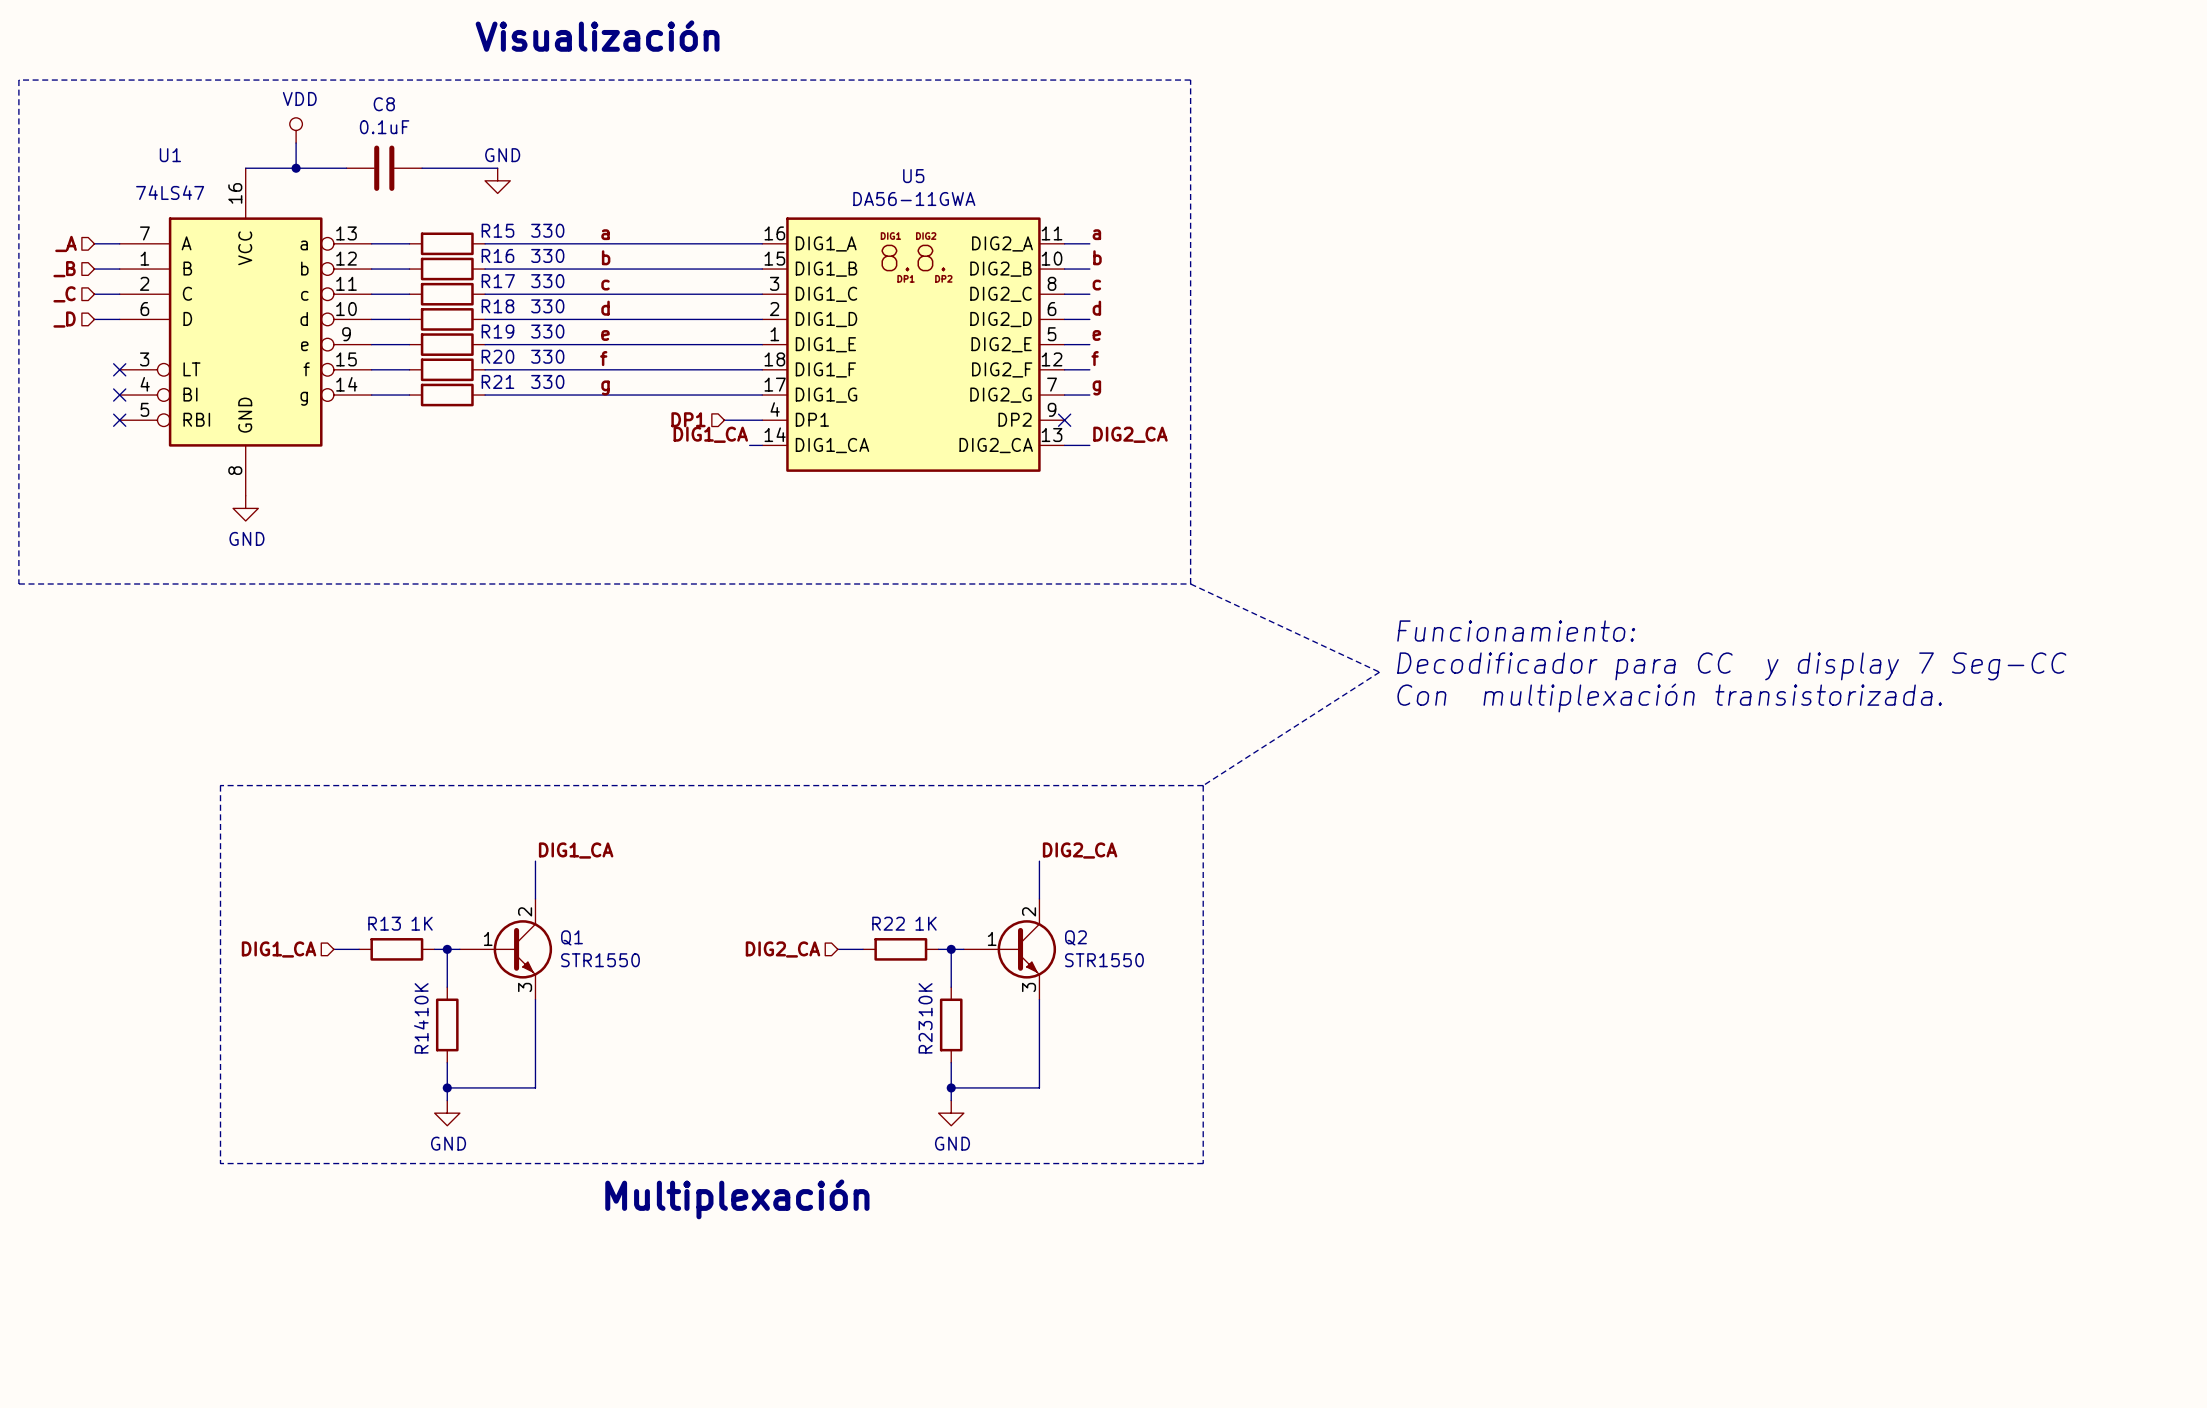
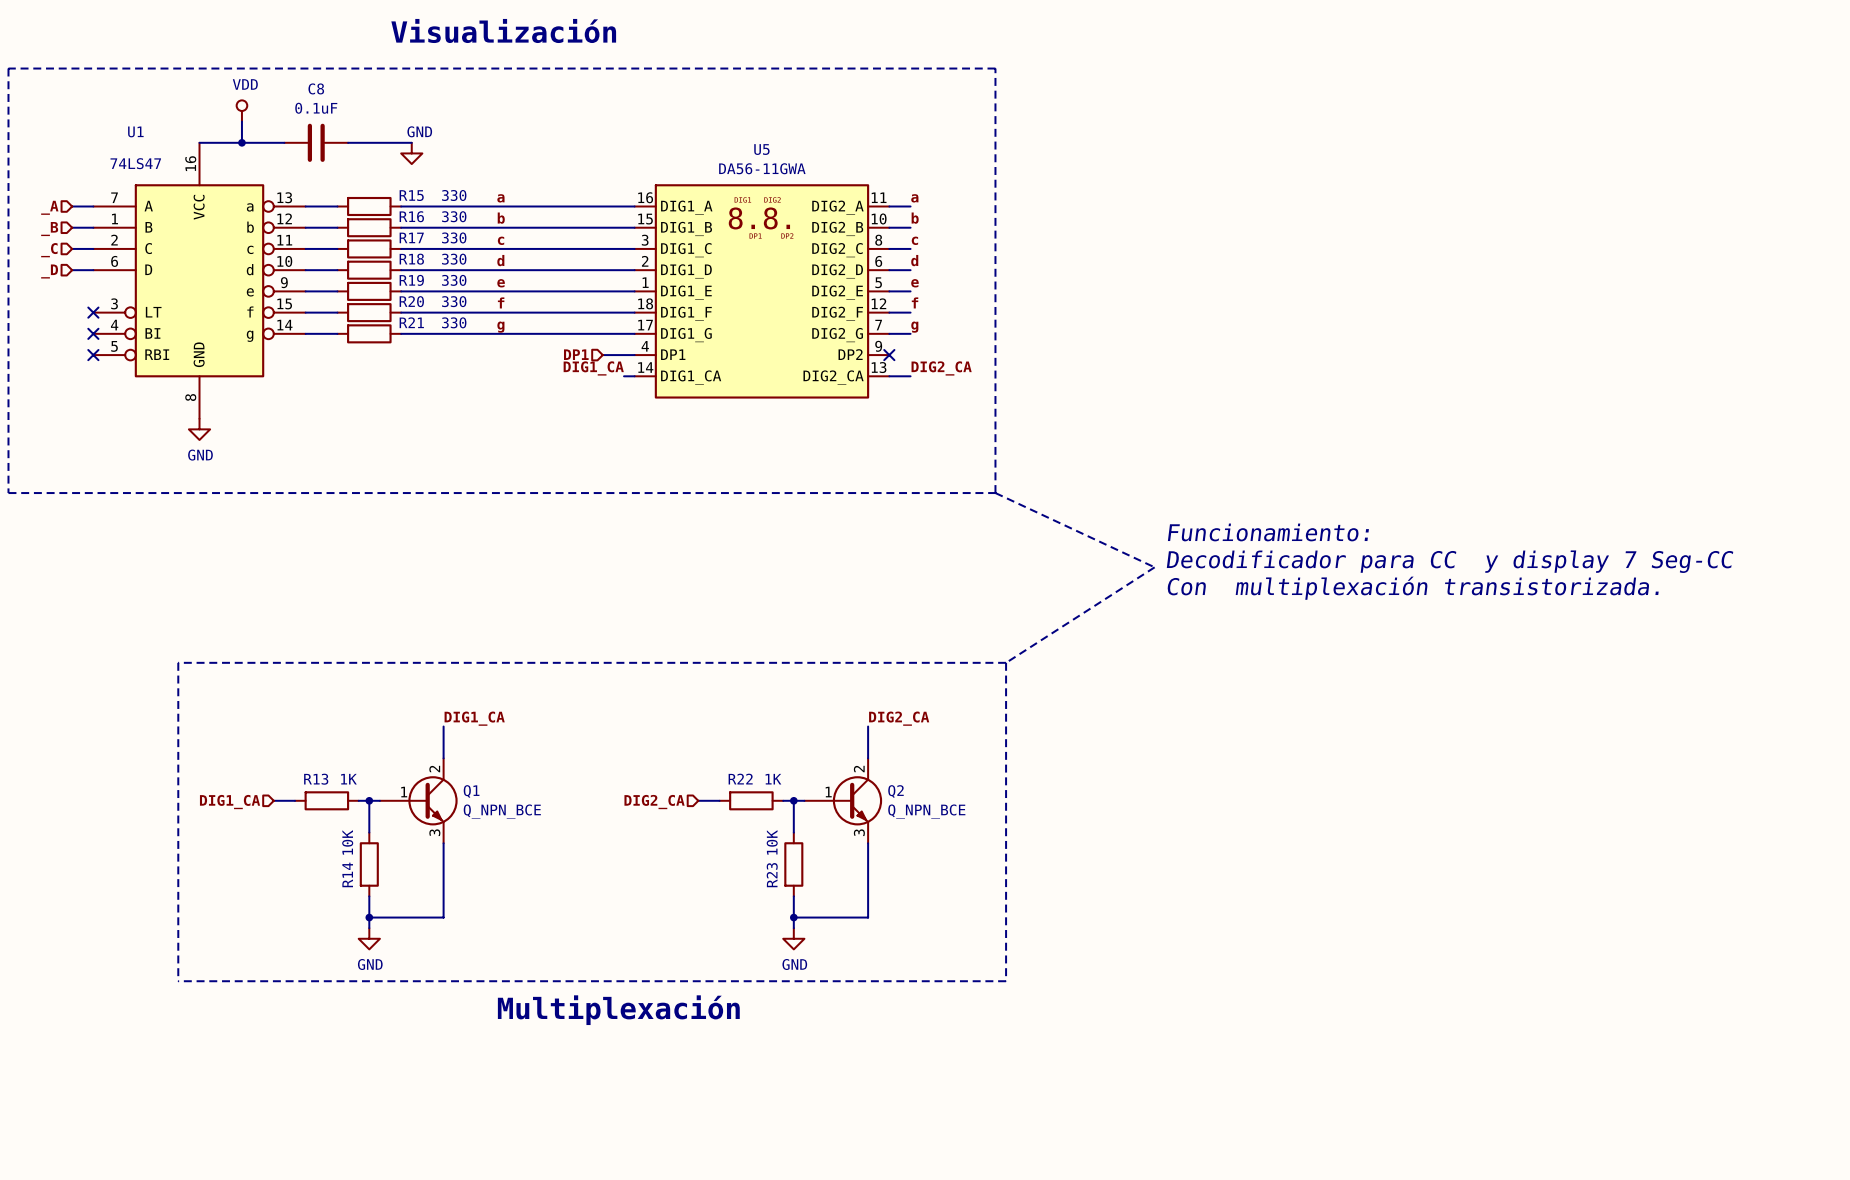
Q1 value: STR1550 (600, 960) -> Q_NPN_BCE (502, 811)
Q2 value: STR1550 (1104, 960) -> Q_NPN_BCE (926, 811)

